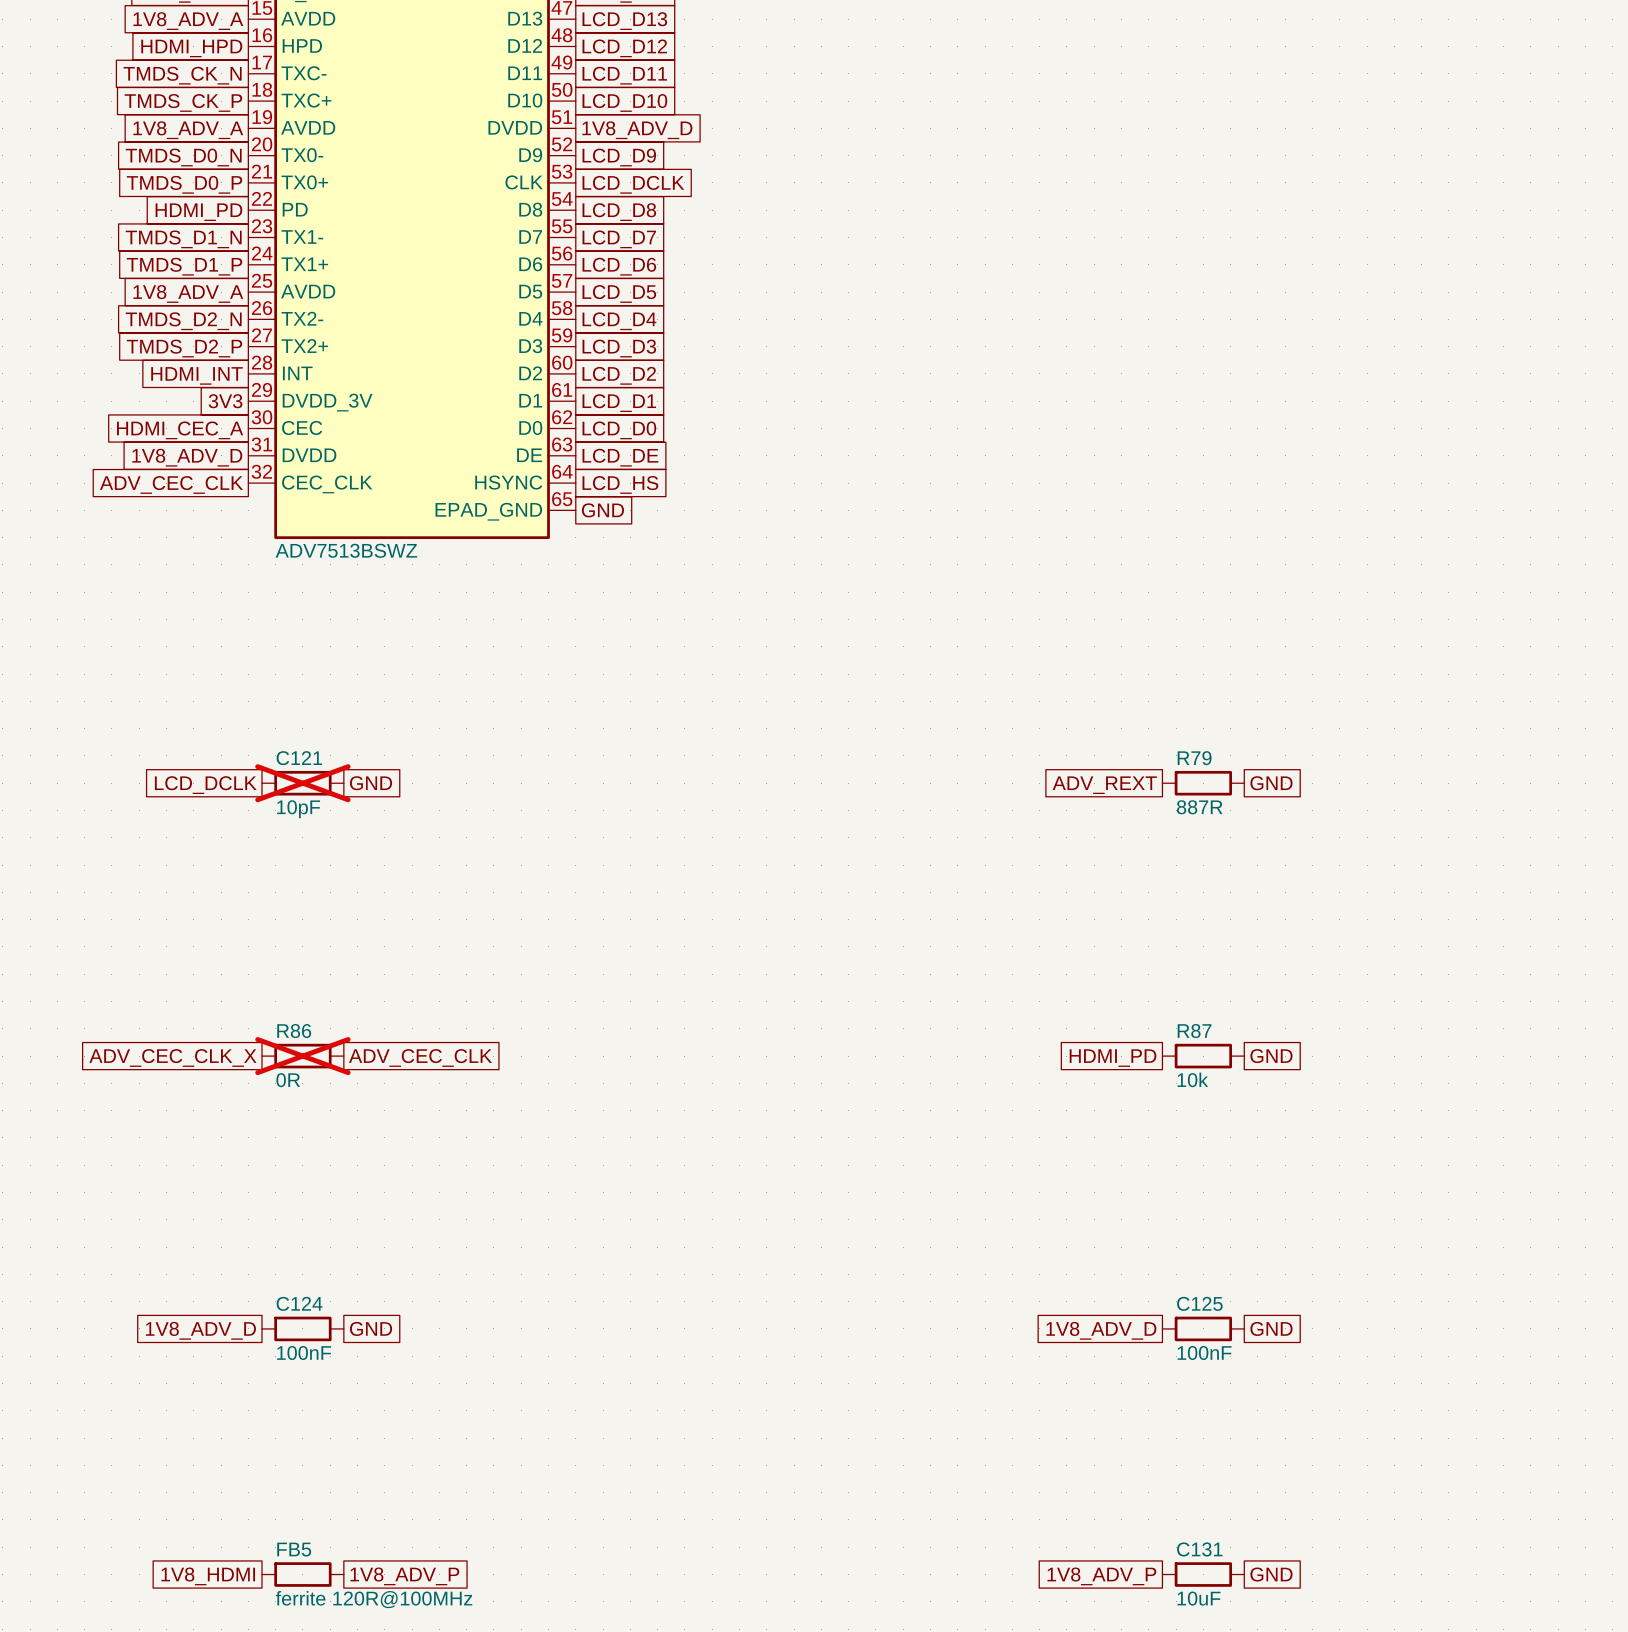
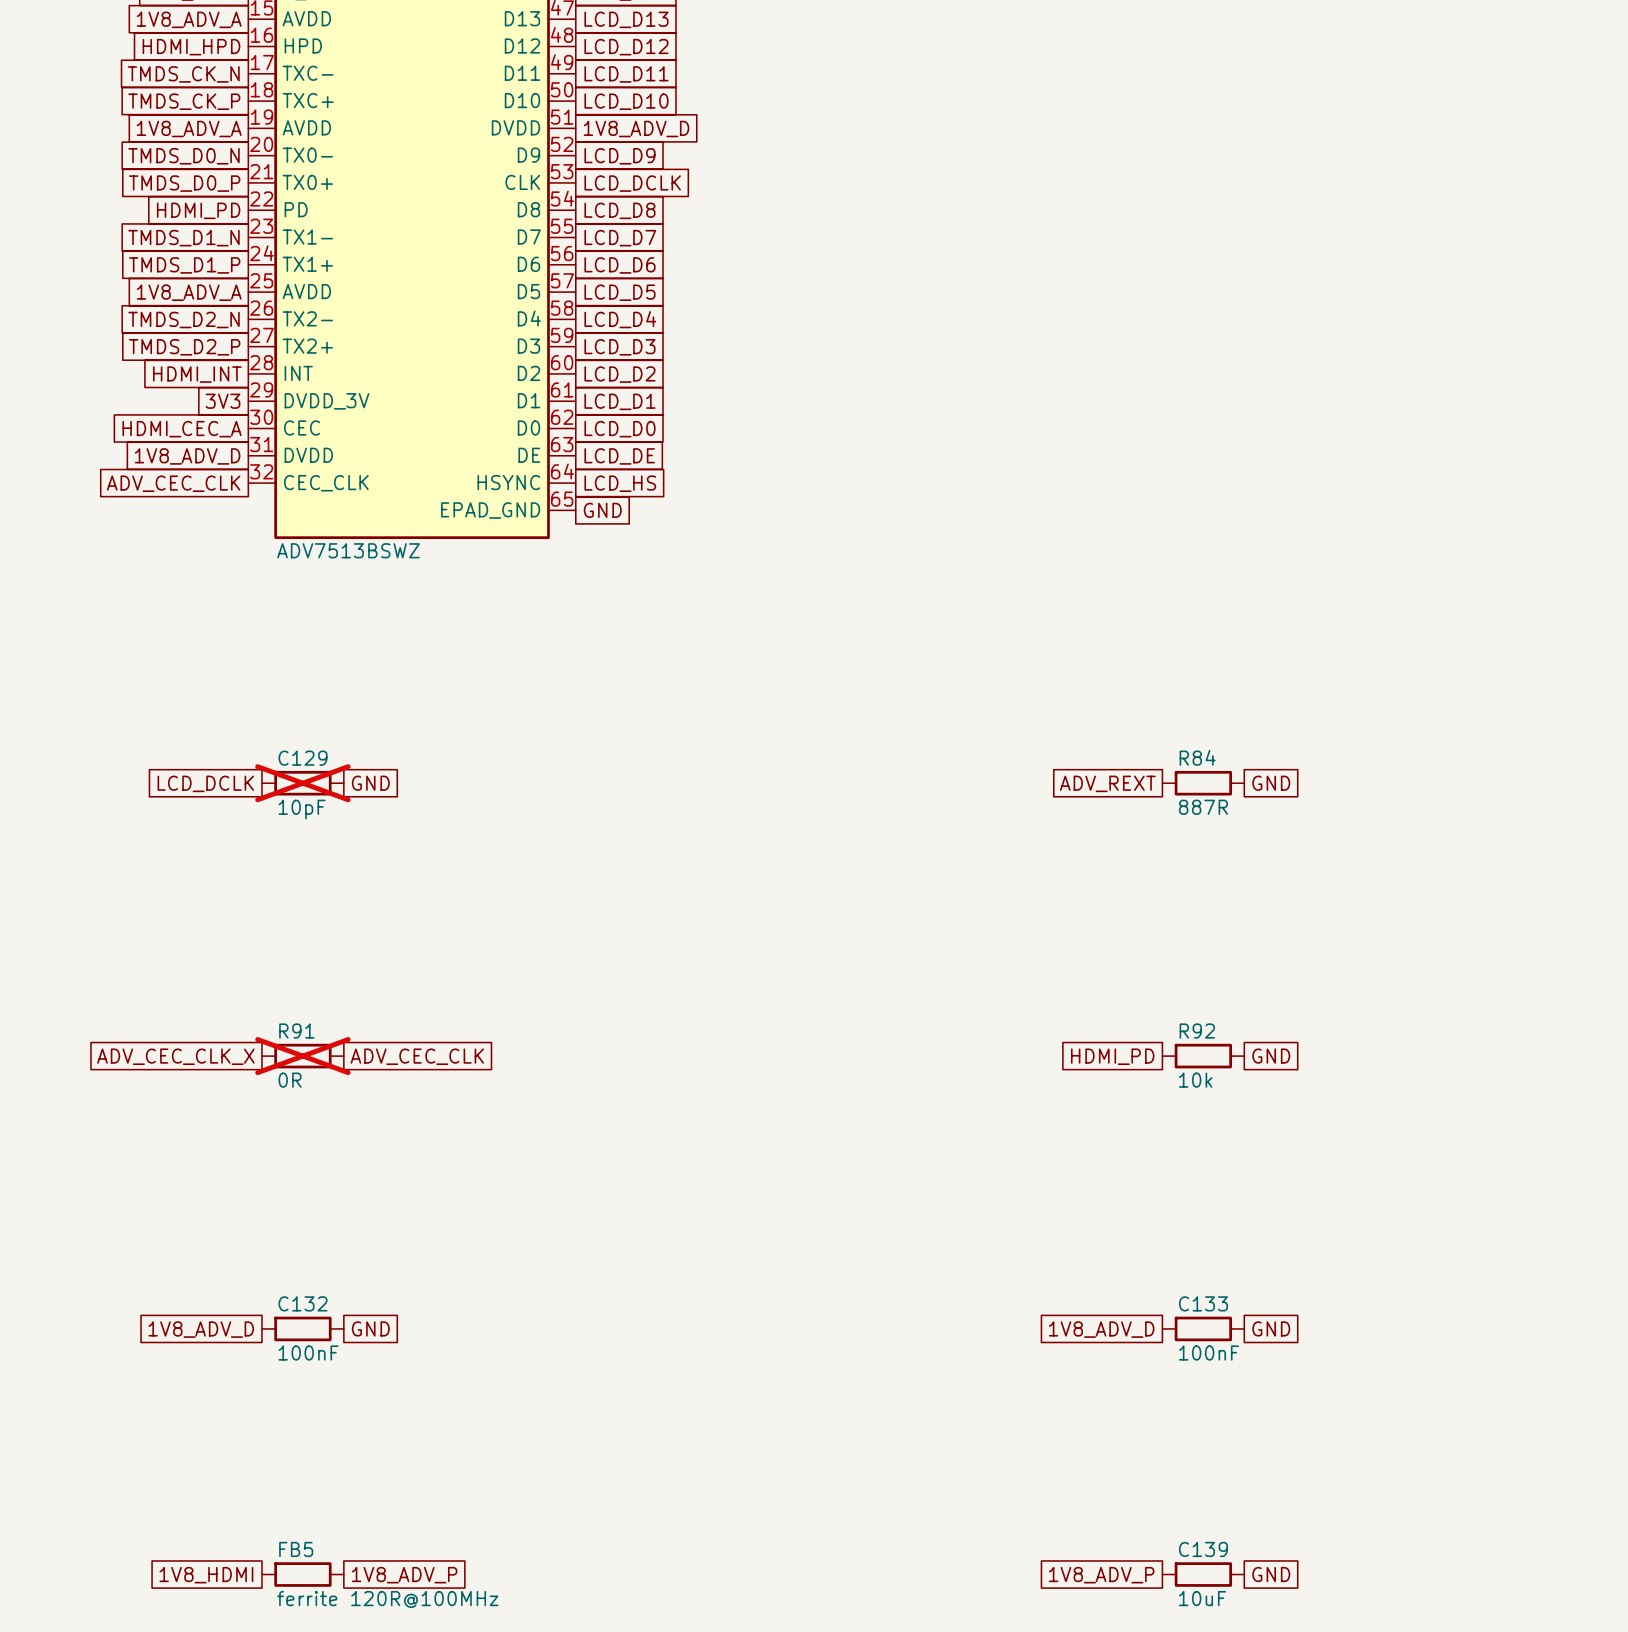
C121 name: C121 (299, 758) -> C129 (303, 758)
R79 name: R79 (1194, 758) -> R84 (1197, 757)
R86 name: R86 (294, 1031) -> R91 (296, 1031)
R87 name: R87 (1194, 1031) -> R92 (1197, 1031)
C124 name: C124 (299, 1303) -> C132 (303, 1303)
C125 name: C125 (1199, 1303) -> C133 (1203, 1303)
C131 name: C131 (1199, 1549) -> C139 (1203, 1549)

